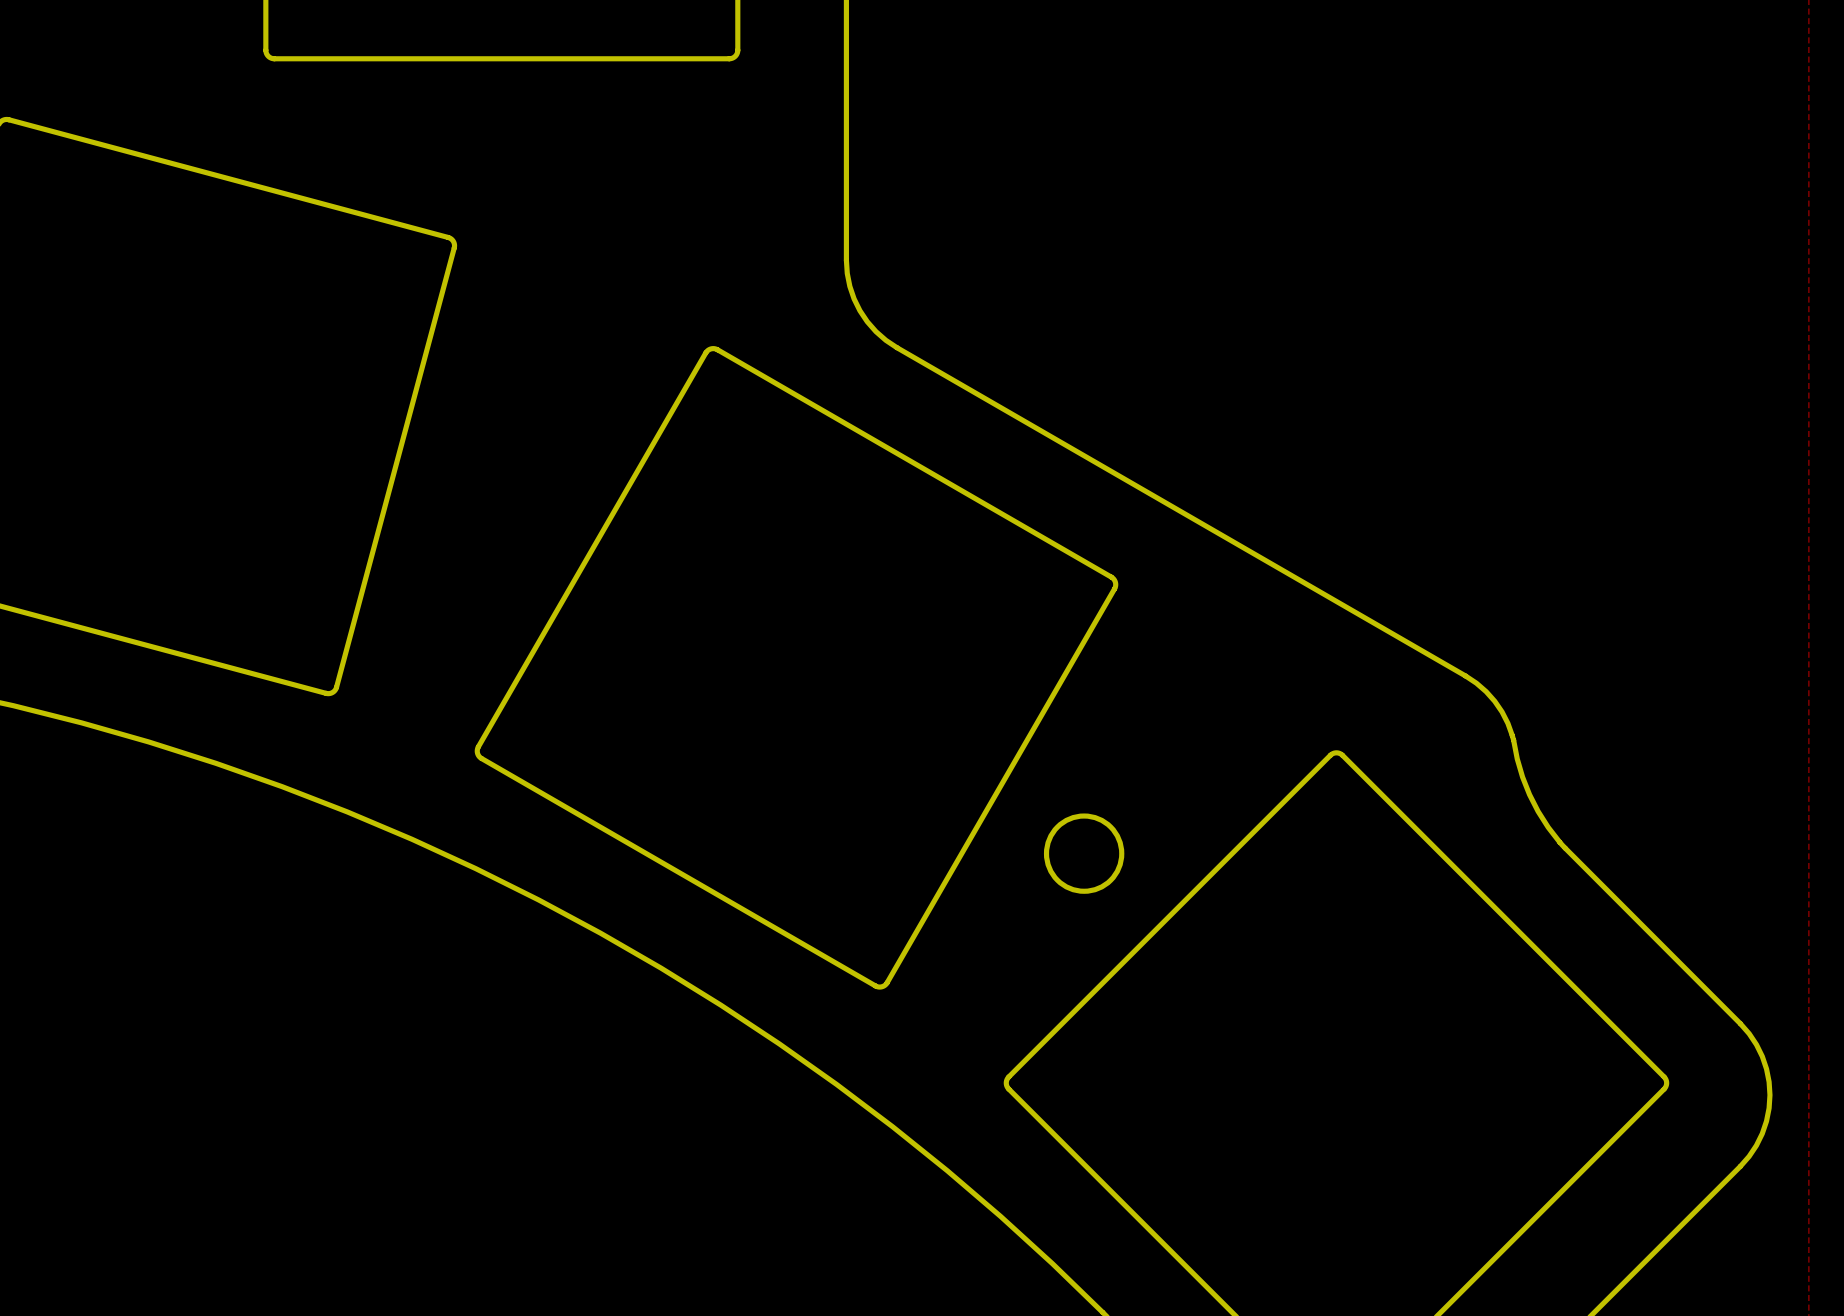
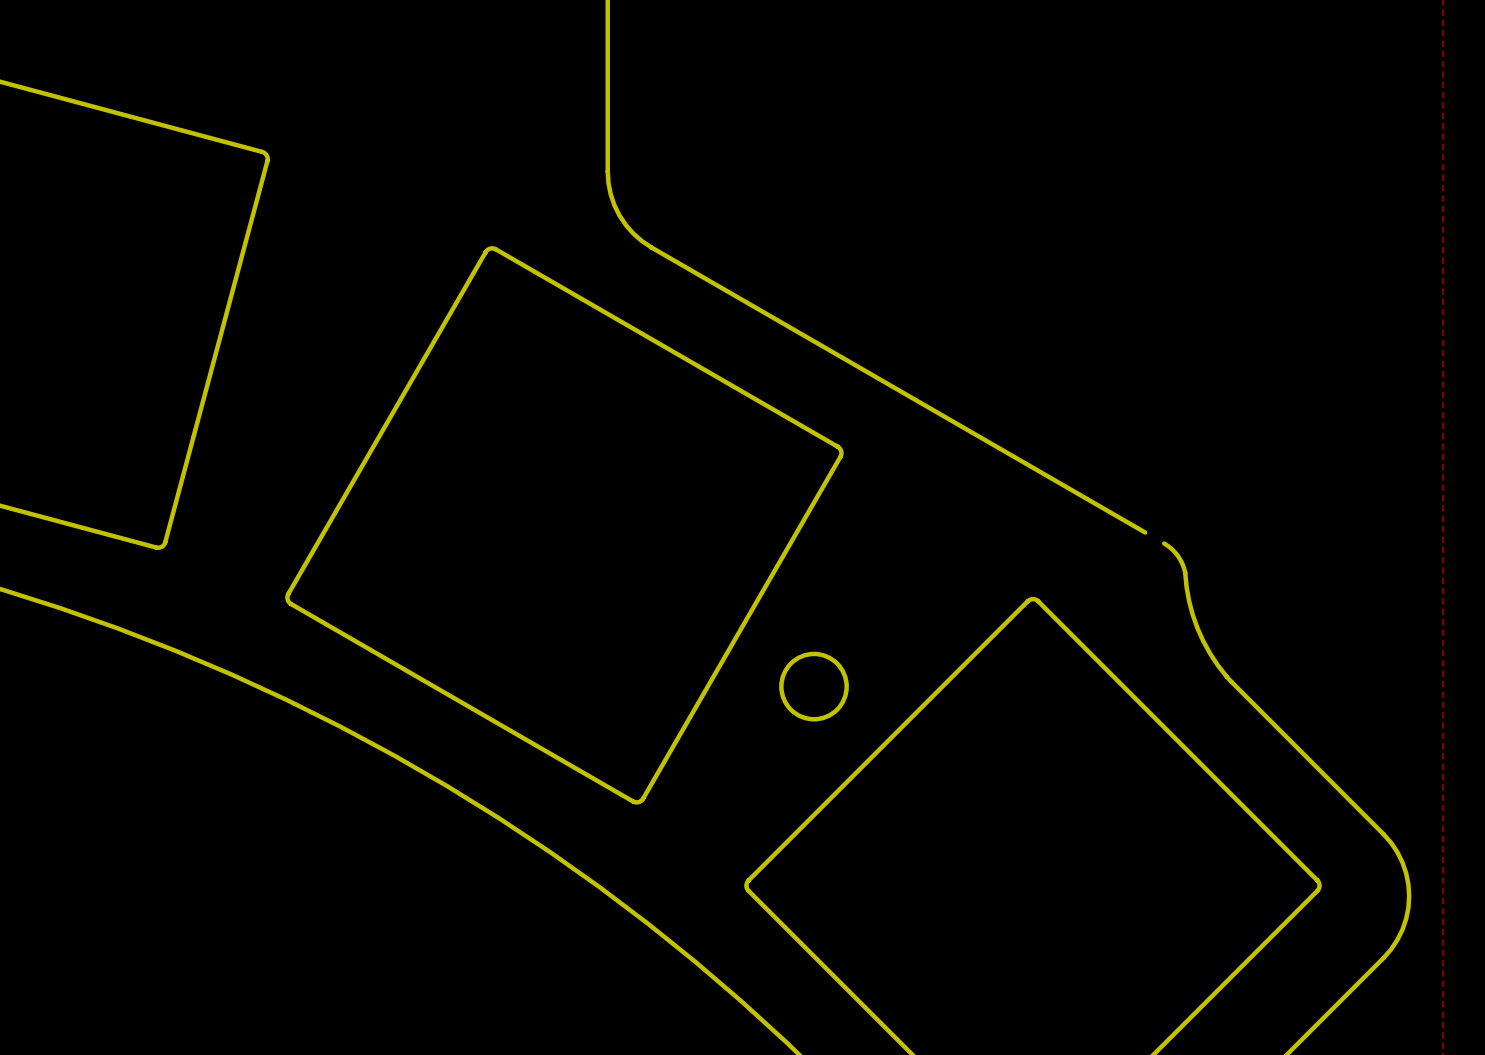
board edge: (1465, 676) (1486, 691) (1502, 711) (1512, 735) (1517, 758) (1529, 794) (1538, 811) (1559, 842) -> (1164, 543) (1174, 552) (1182, 563) (1189, 600) (1197, 628) (1210, 653) (1226, 676)

